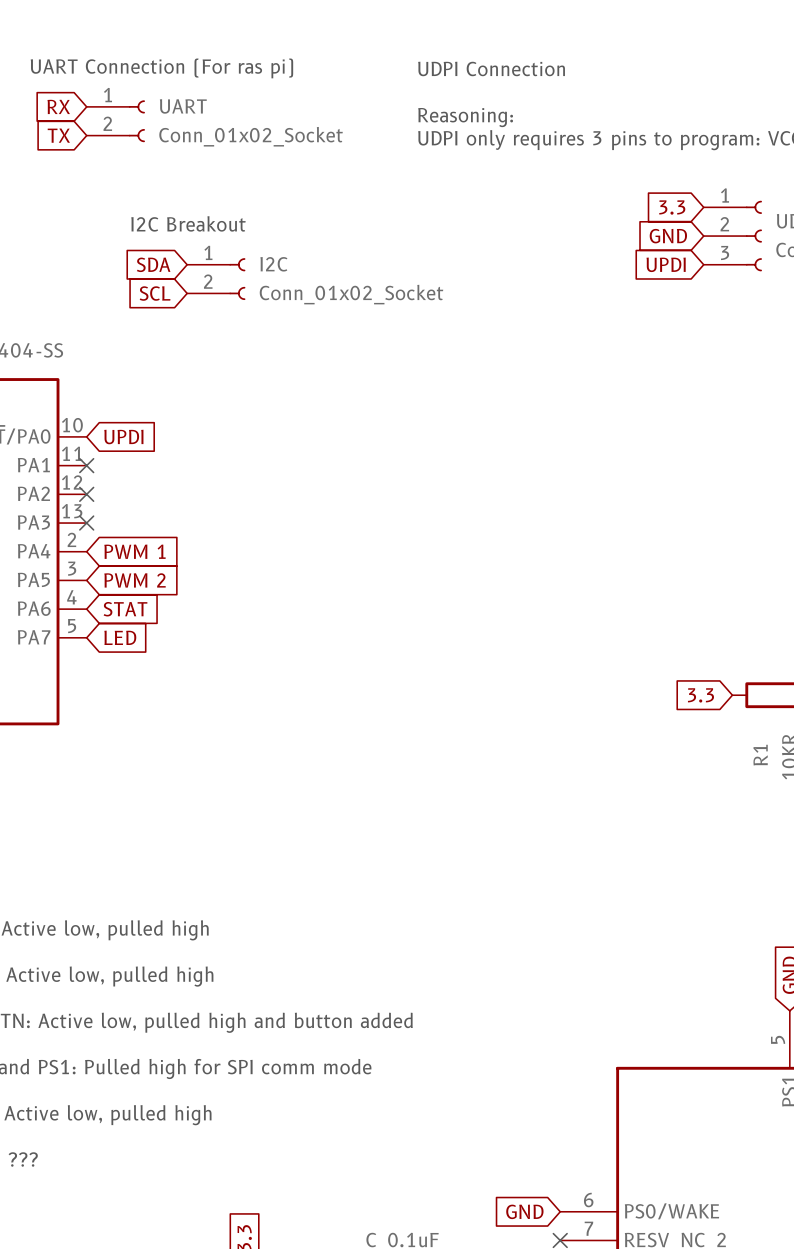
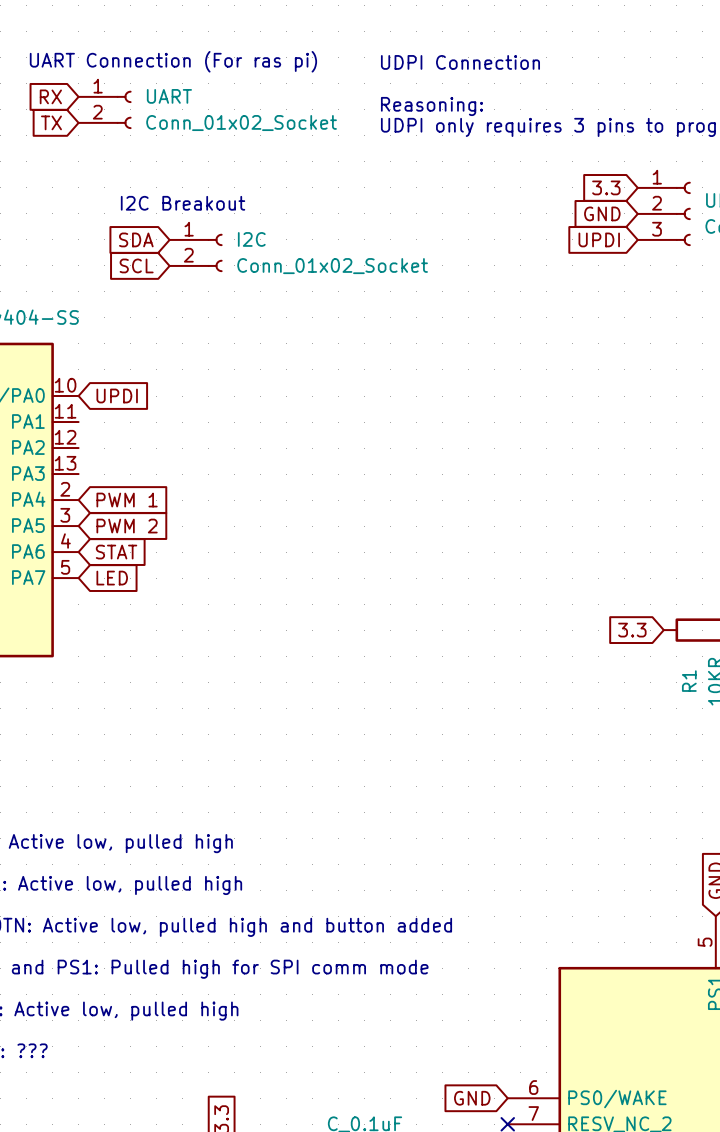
no-connect mark: (86, 465) -> none
no-connect mark: (86, 494) -> none
no-connect mark: (86, 523) -> none

